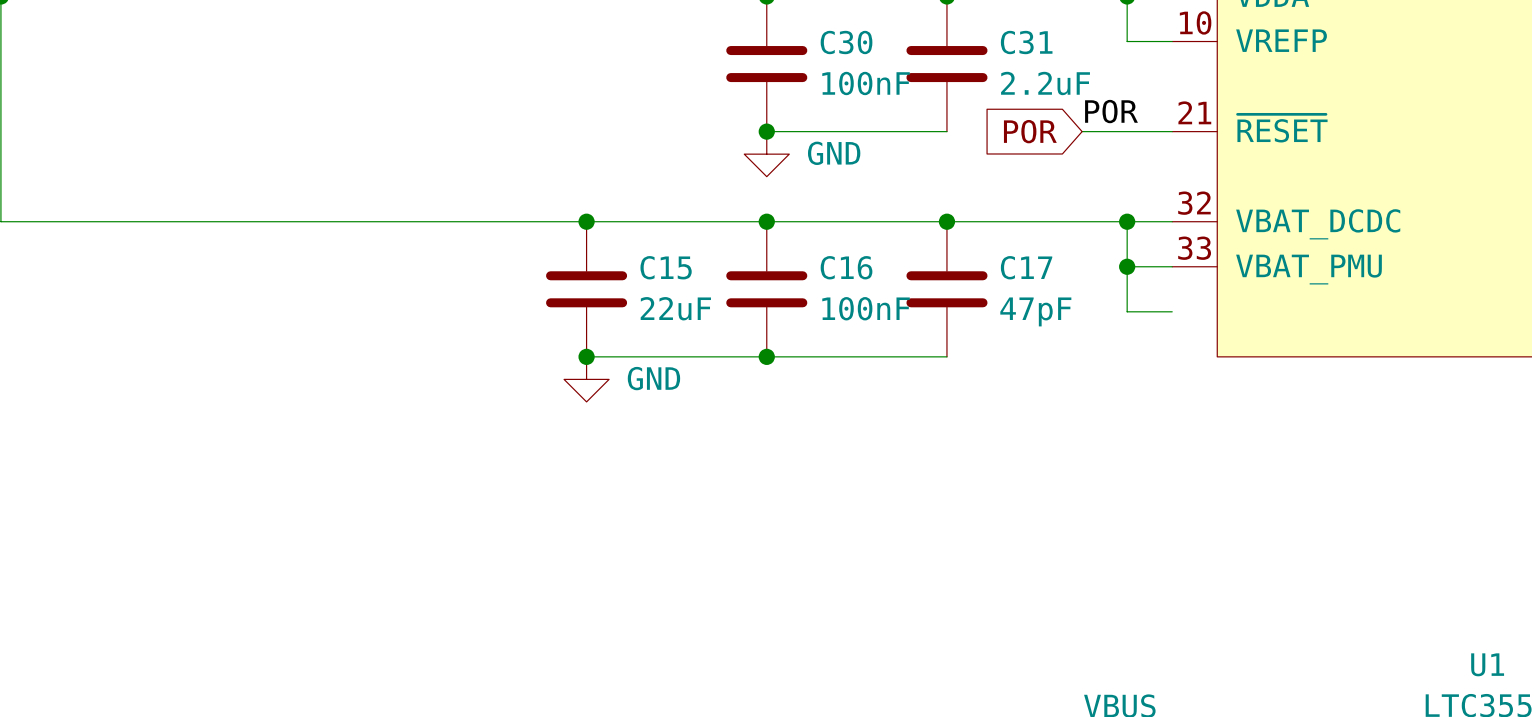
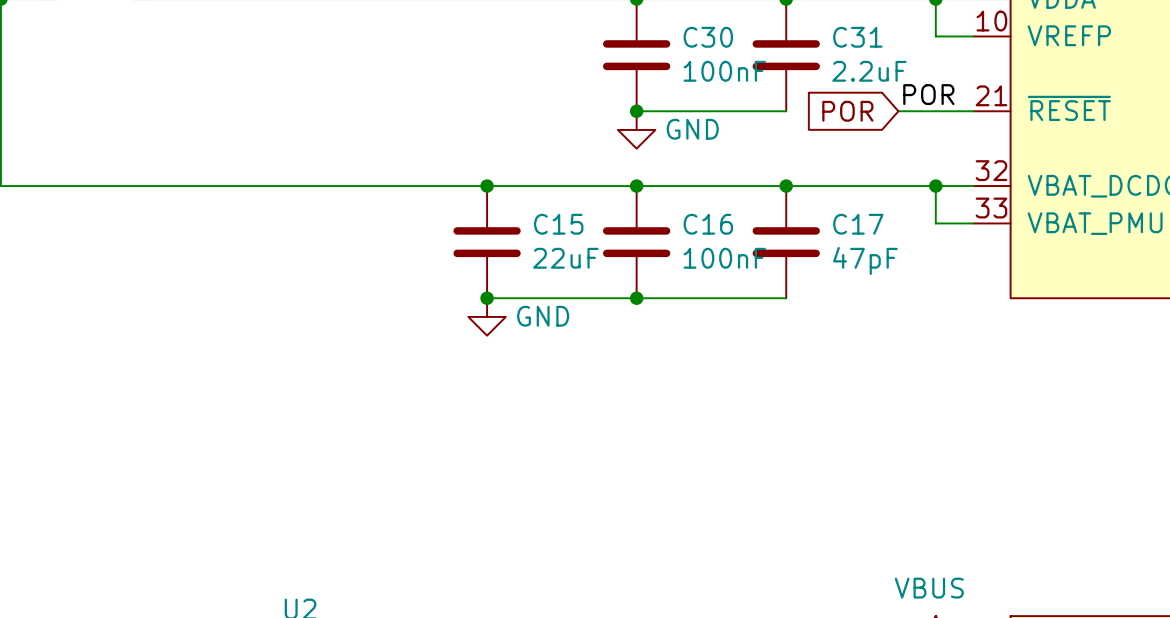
wire: (1127, 266) (1127, 311) (1172, 311) -> none
junction: (1127, 266) -> none

